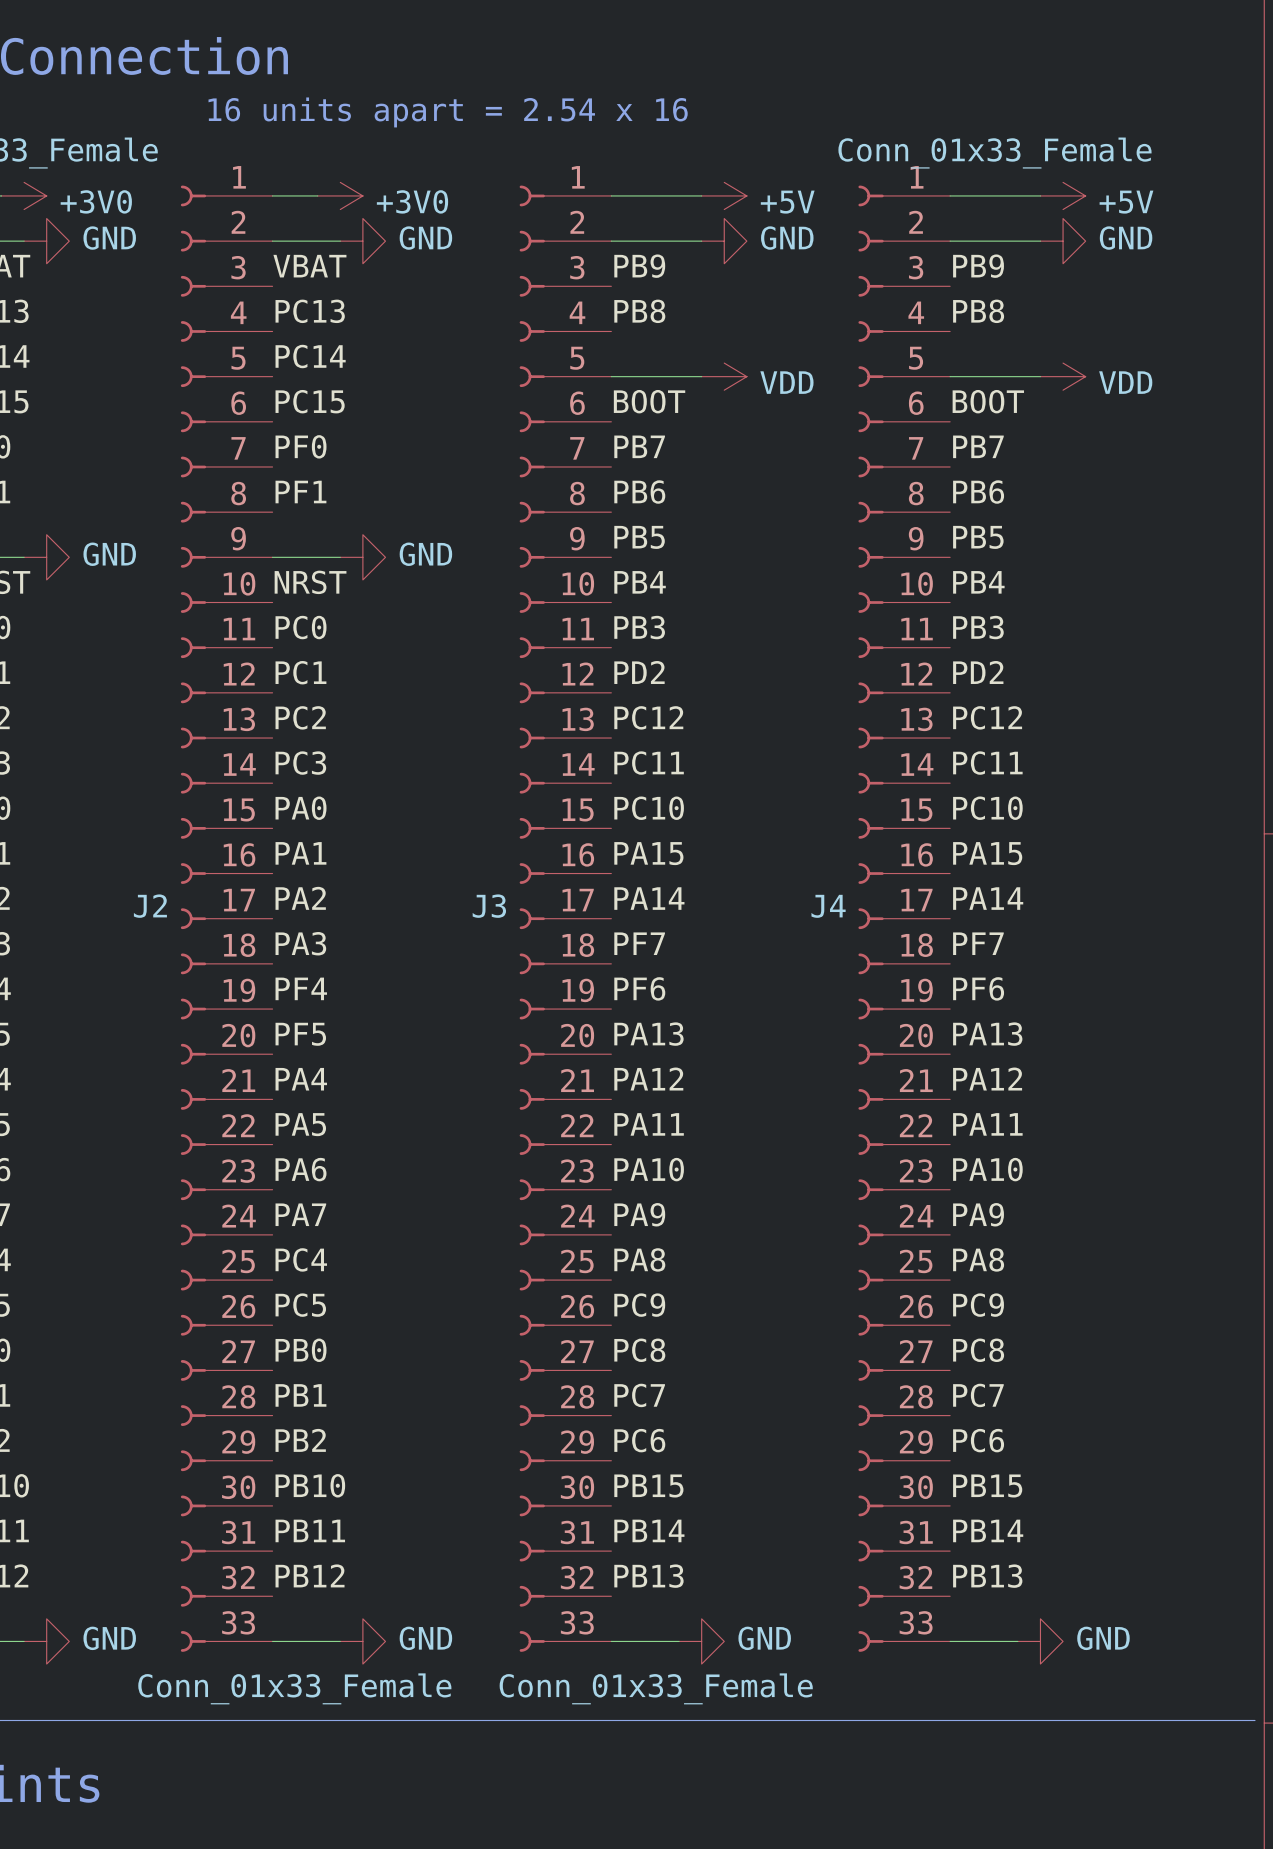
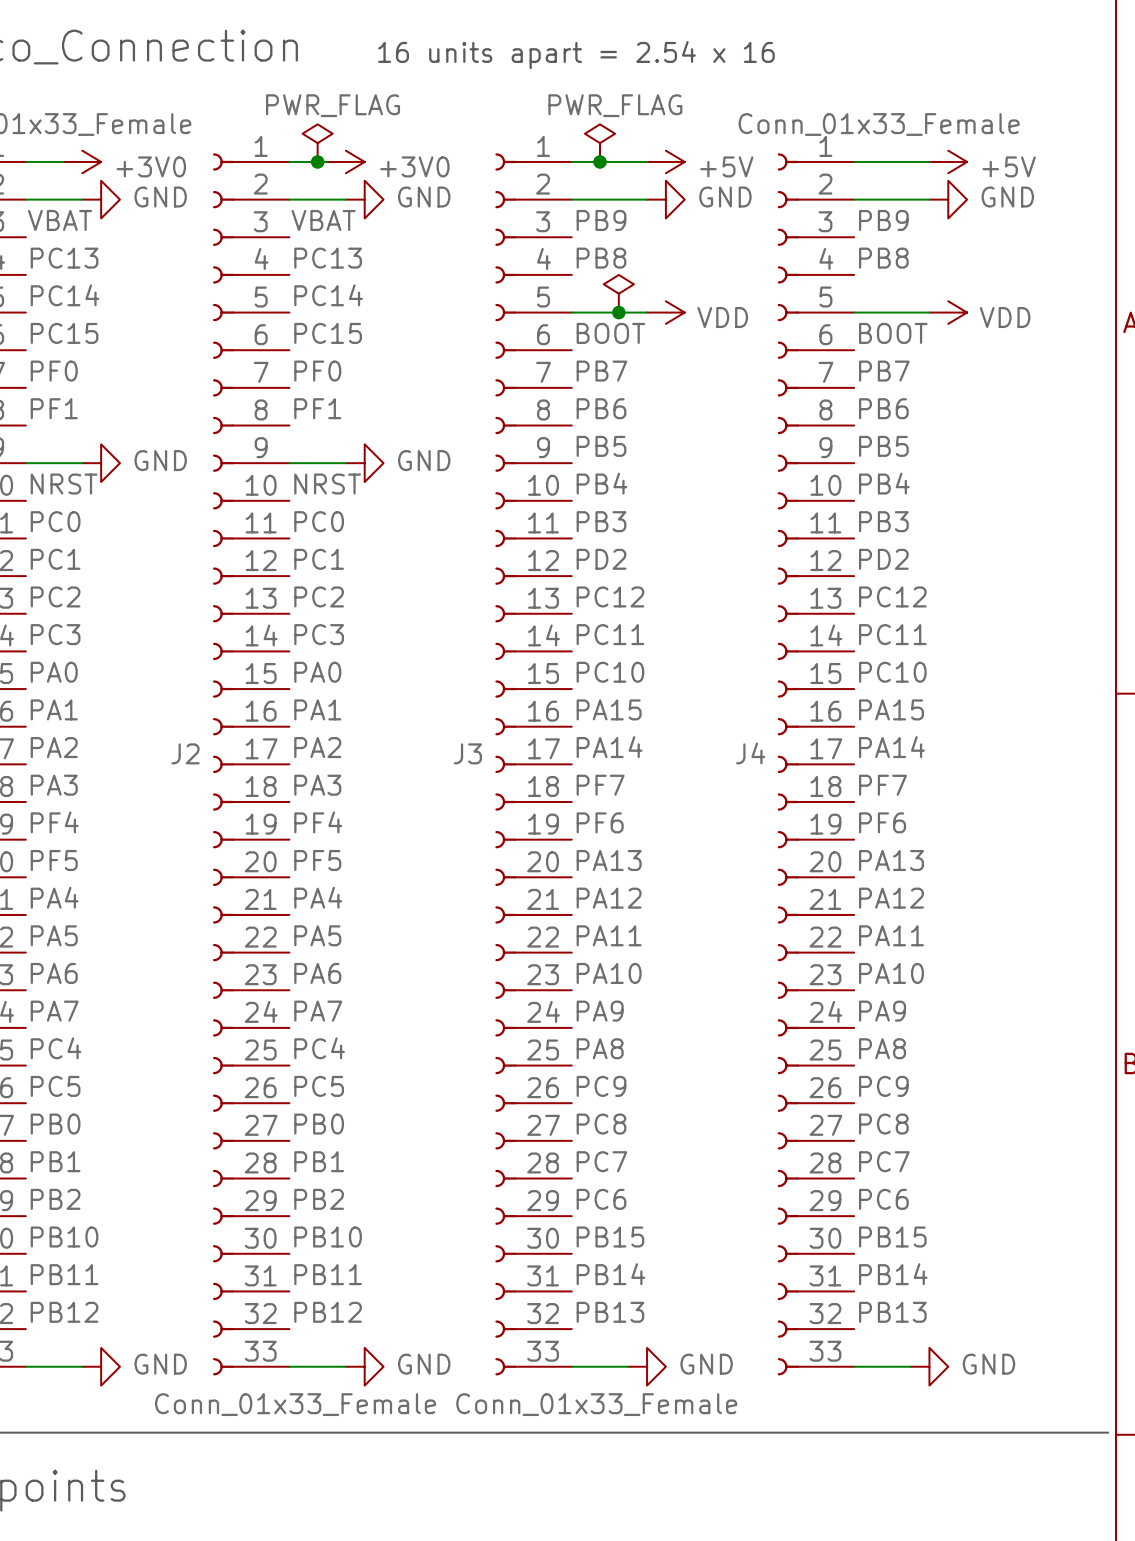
text position: 16 units apart = 2.54 x 16 (448, 112) -> 16 units apart = 2.54 x 16 (576, 55)
power symbol: none -> PWR_FLAG (317, 143)
power symbol: none -> PWR_FLAG (600, 143)
junction: none -> (317, 161)
junction: none -> (600, 161)
power symbol: none -> (618, 293)
junction: none -> (618, 312)

